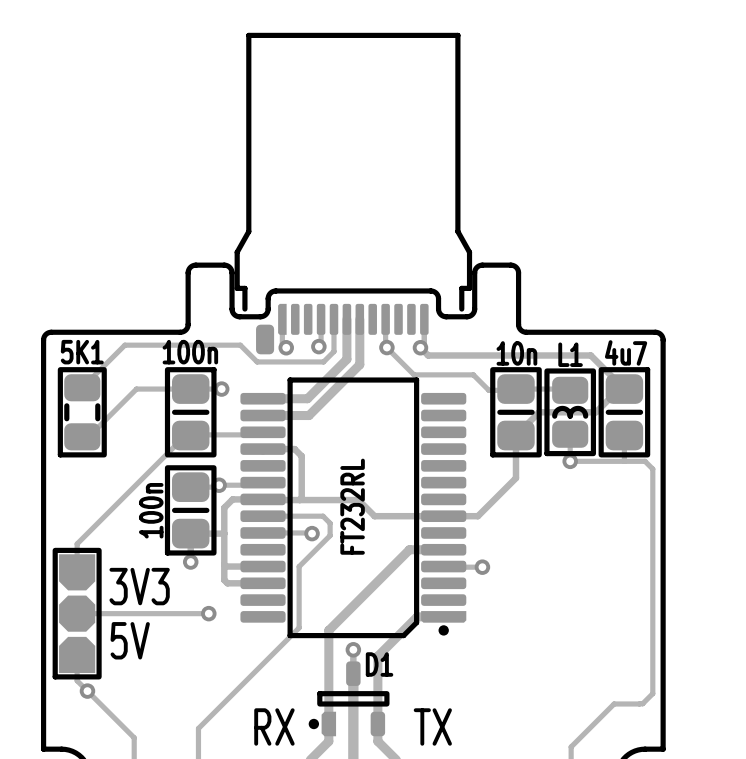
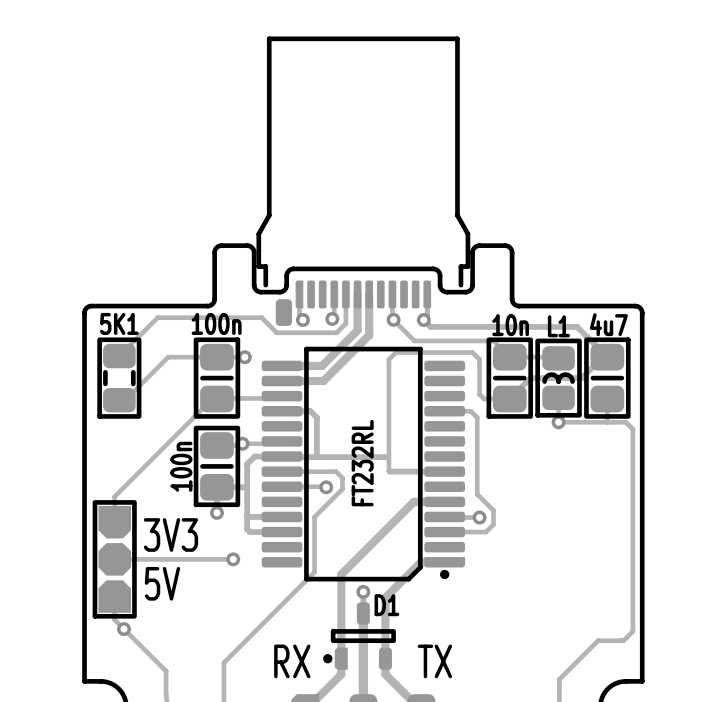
track: (410, 370) (414, 374) (473, 374) (488, 390) (515, 390) -> (414, 340) (493, 340) (509, 357)
track: (515, 435) (515, 478) (477, 516) (443, 516) -> (509, 399) (484, 399) (479, 394) (479, 359) (472, 352) (395, 352) (388, 359) (389, 471)
track: none -> (444, 411) (470, 411) (477, 417) (477, 494) (493, 510) (493, 524) (485, 532) (444, 532)
track: (358, 500) (374, 516) (382, 516) -> (368, 457) (386, 457)

